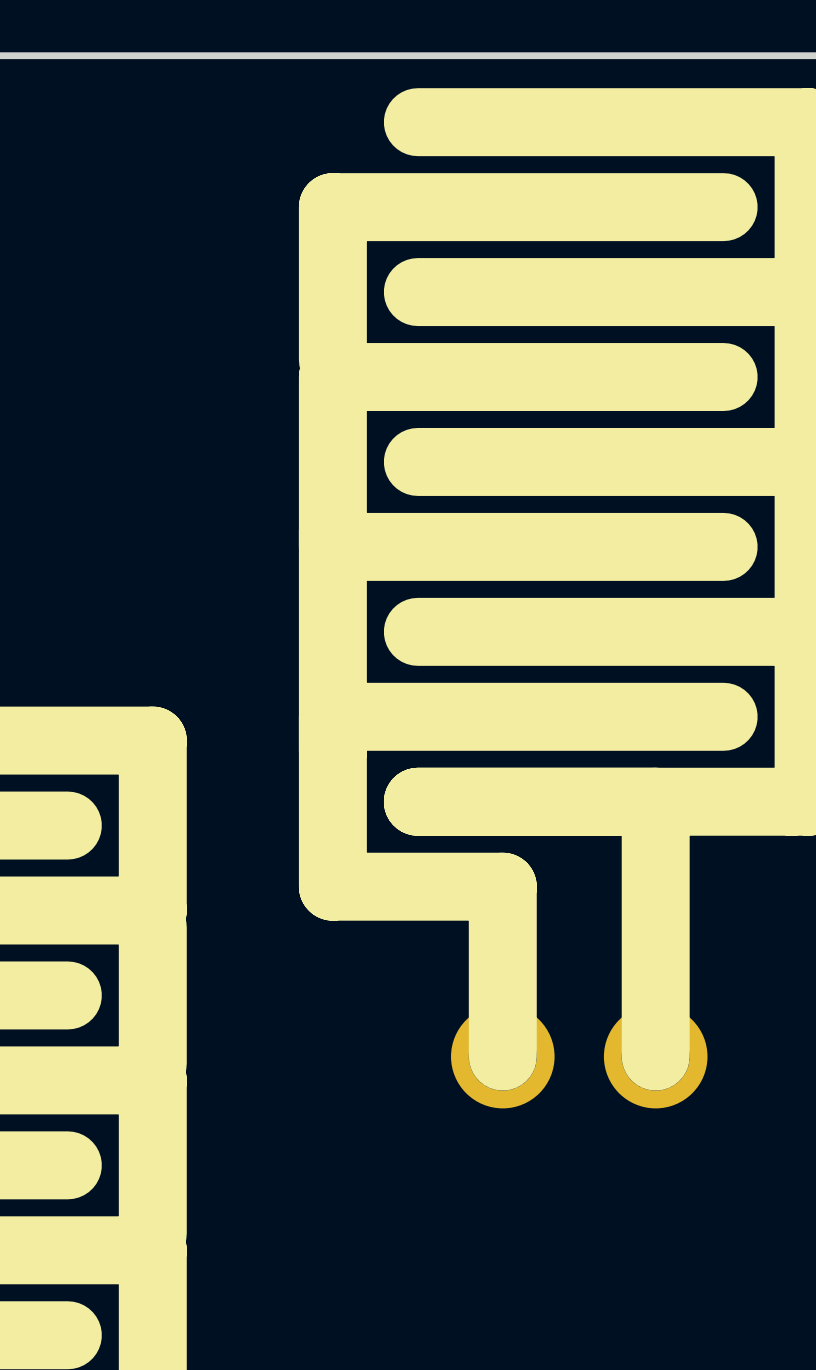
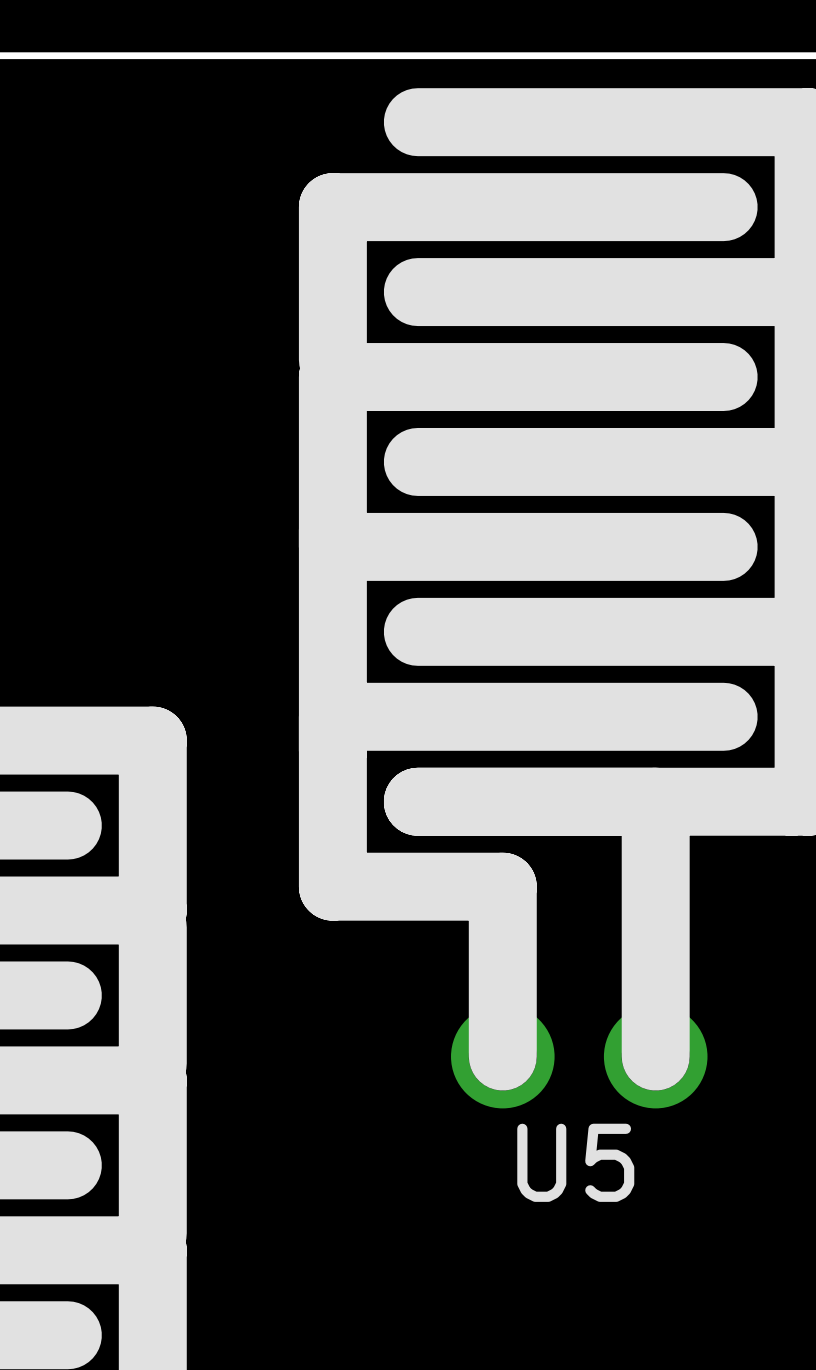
U5 name: none -> U5 (575, 1162)

